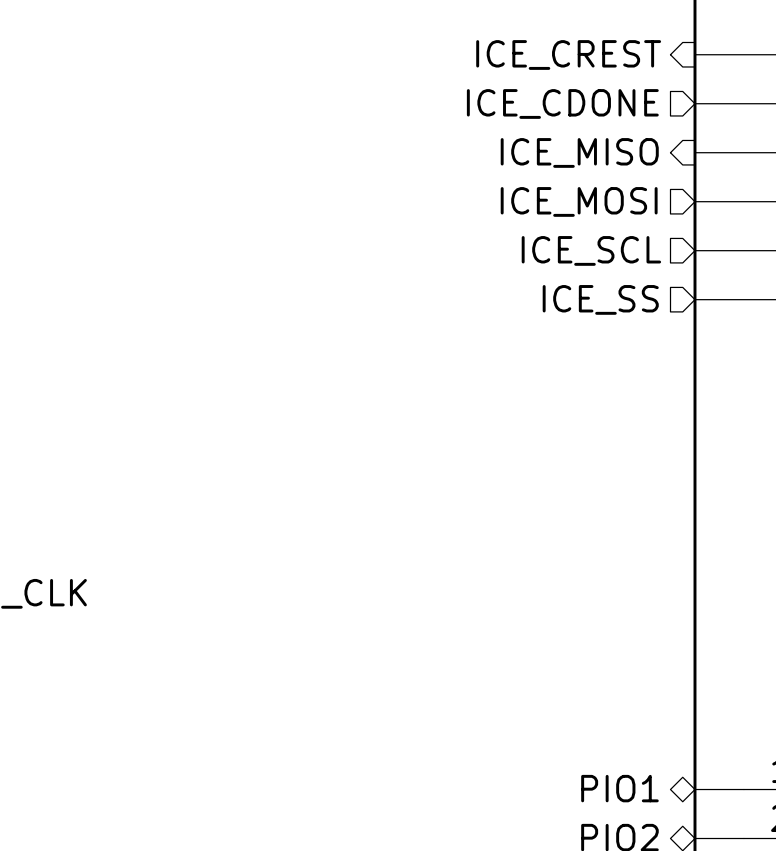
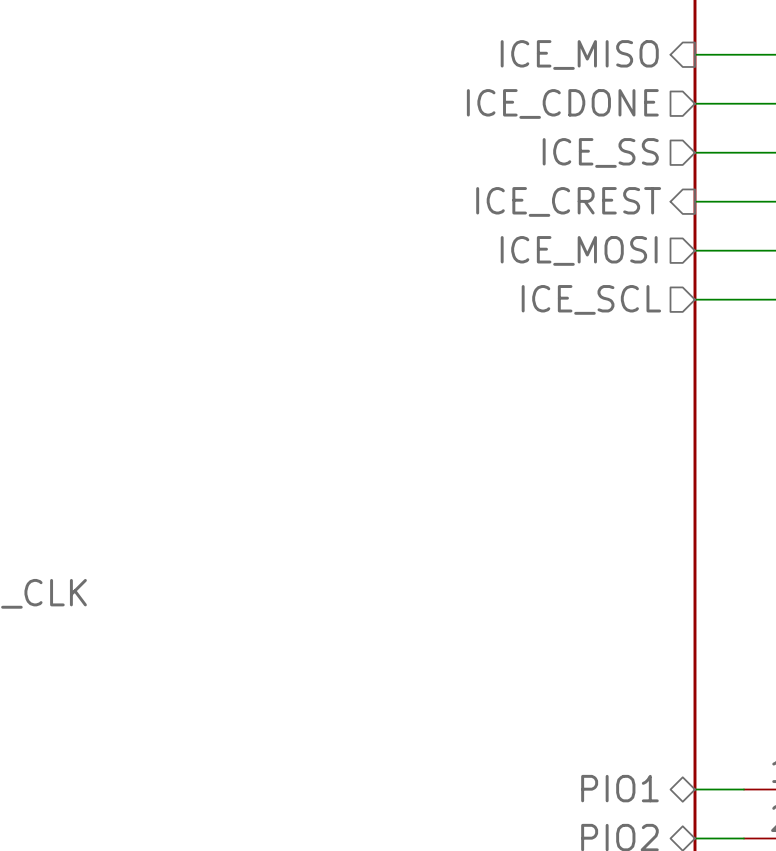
sheet pin: ICE_CREST (568, 54) -> ICE_MISO (579, 54)
sheet pin shape: input (579, 152) -> output (600, 152)
sheet pin: ICE_MISO (579, 152) -> ICE_SS (600, 152)
sheet pin shape: output (579, 201) -> input (568, 201)
sheet pin: ICE_MOSI (579, 201) -> ICE_CREST (568, 201)
sheet pin: ICE_SCL (591, 250) -> ICE_MOSI (579, 250)
sheet pin: ICE_SS (600, 299) -> ICE_SCL (591, 299)

